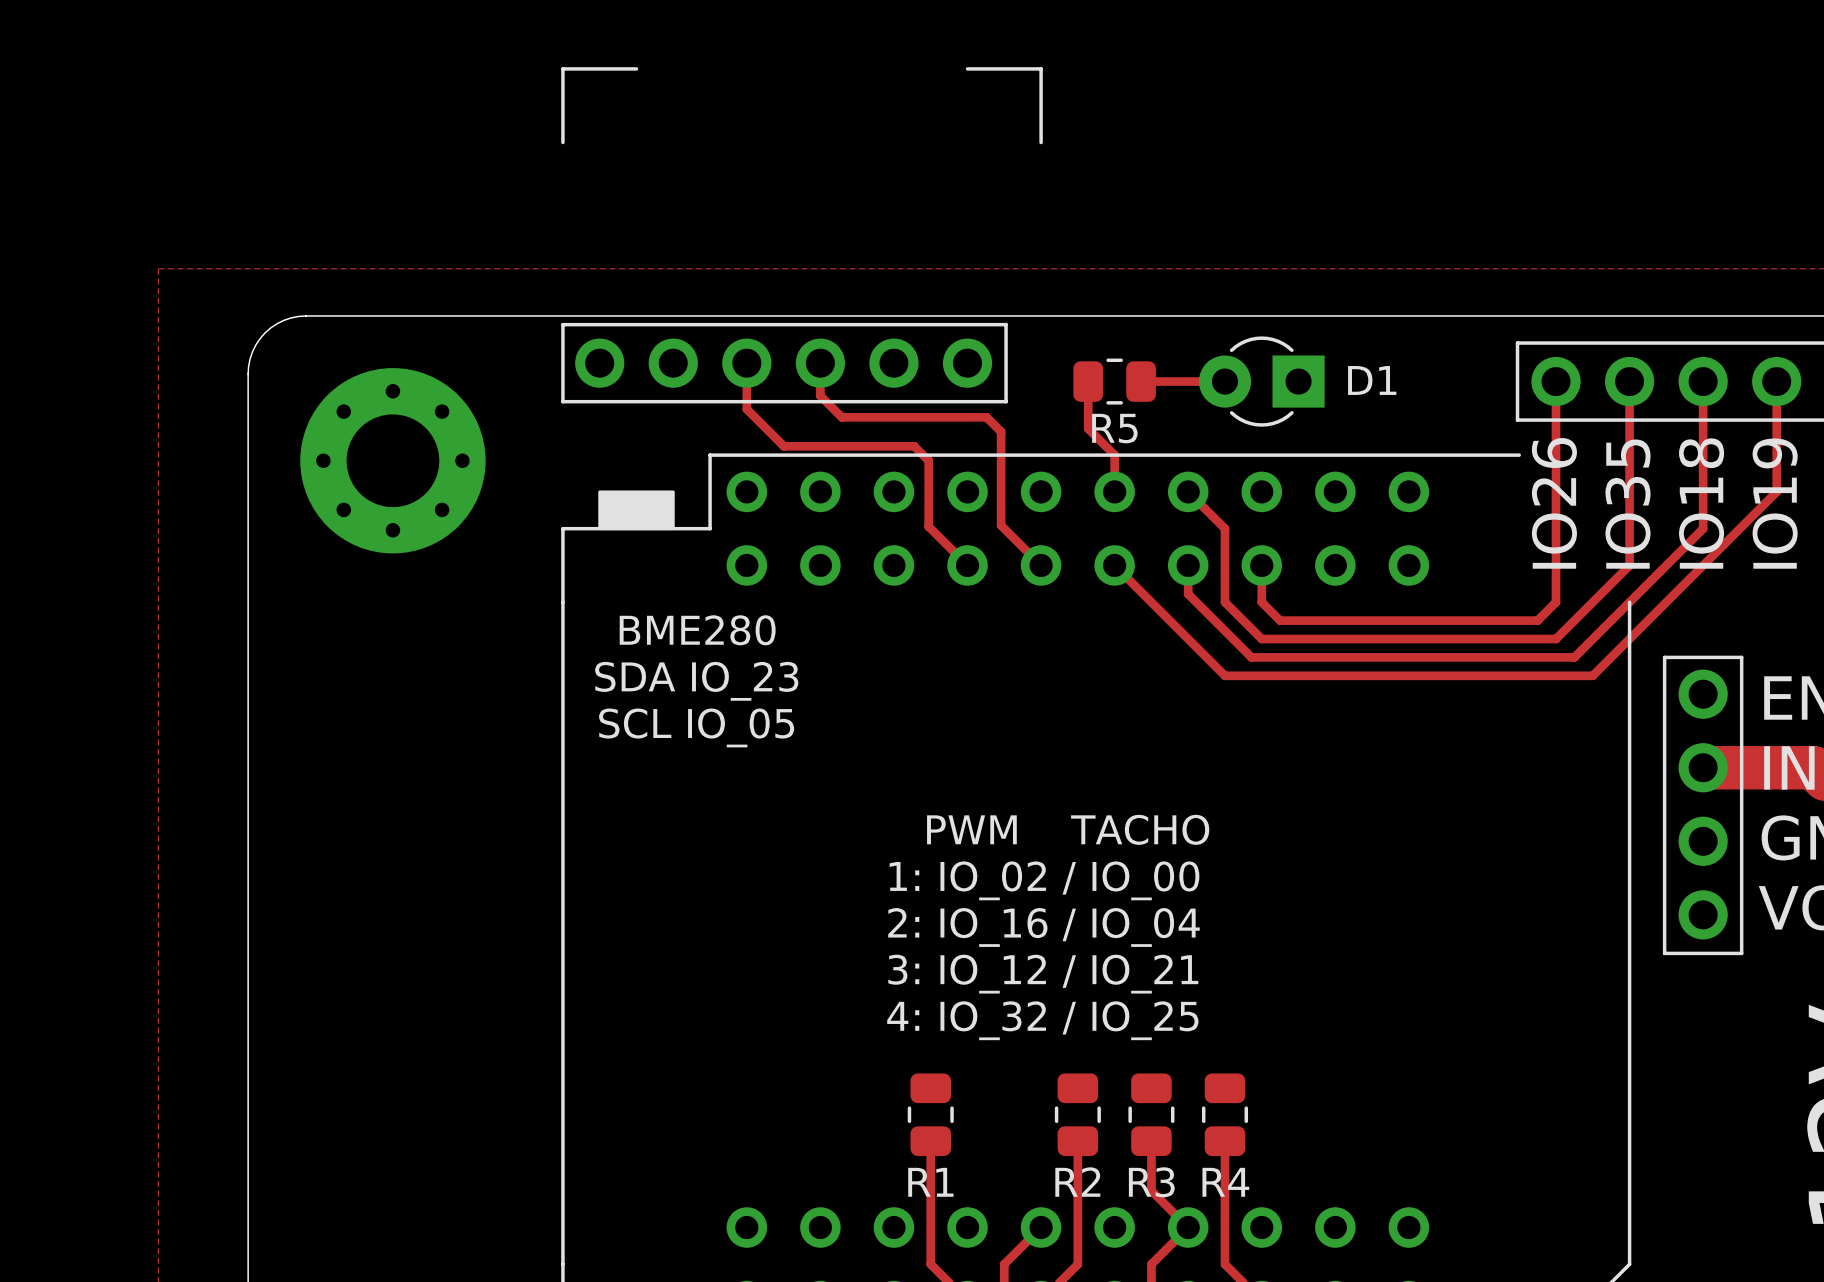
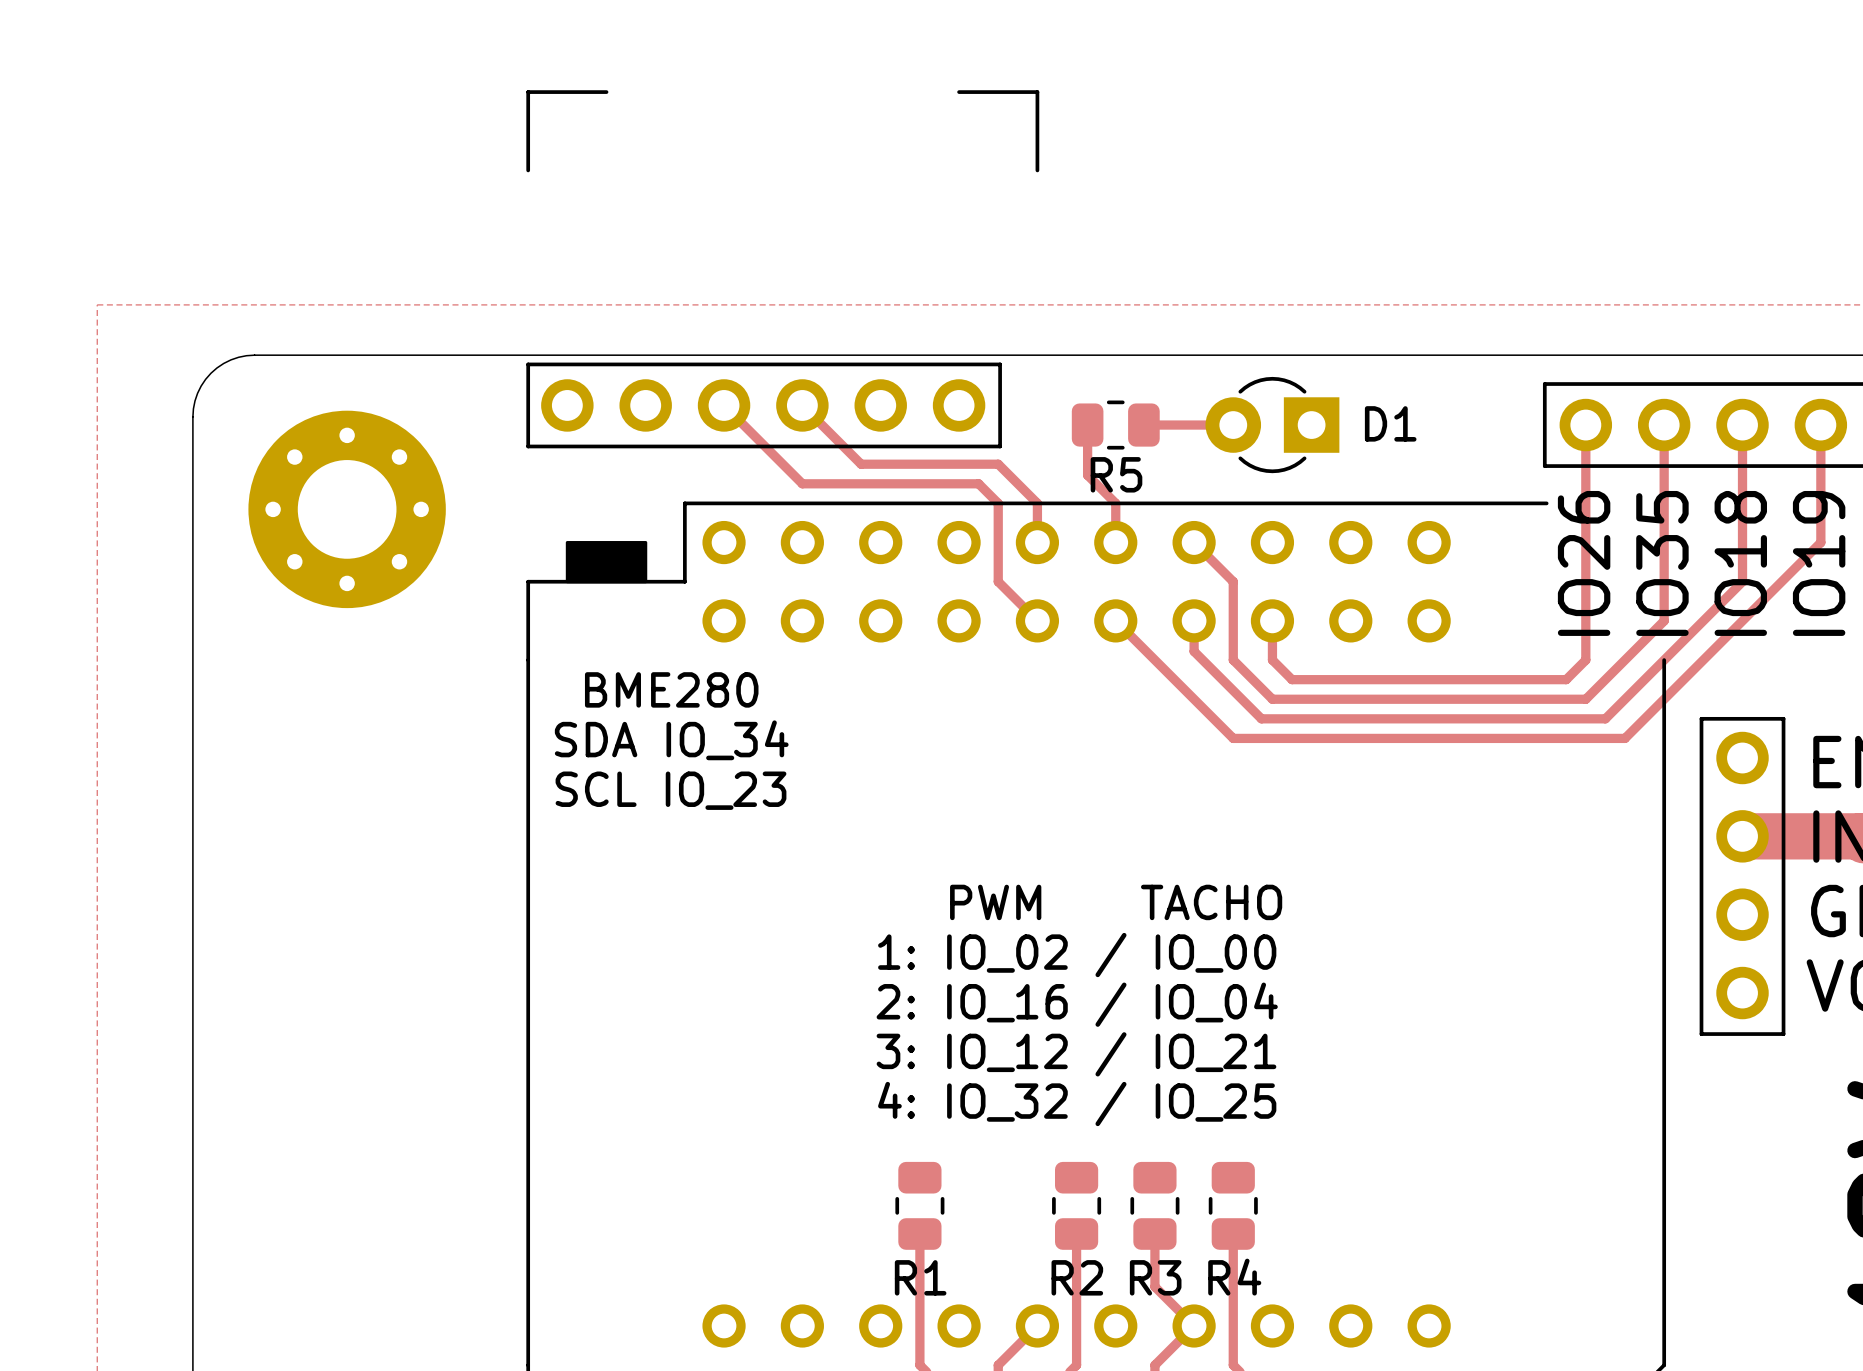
track: (746, 363) (746, 409) (783, 446) (914, 446) (928, 460) (928, 526) (967, 565) -> (724, 405) (802, 483) (978, 483) (998, 503) (998, 581)
track: (820, 363) (820, 395) (841, 417) (986, 417) (1001, 431) (1001, 525) (1004, 528) -> (802, 405) (861, 464) (998, 464) (1037, 503) (1037, 542)
text: SDA IO_23 (696, 681) -> SDA IO_34 (671, 740)
text: SCL IO_05 (696, 727) -> SCL IO_23 (670, 790)

